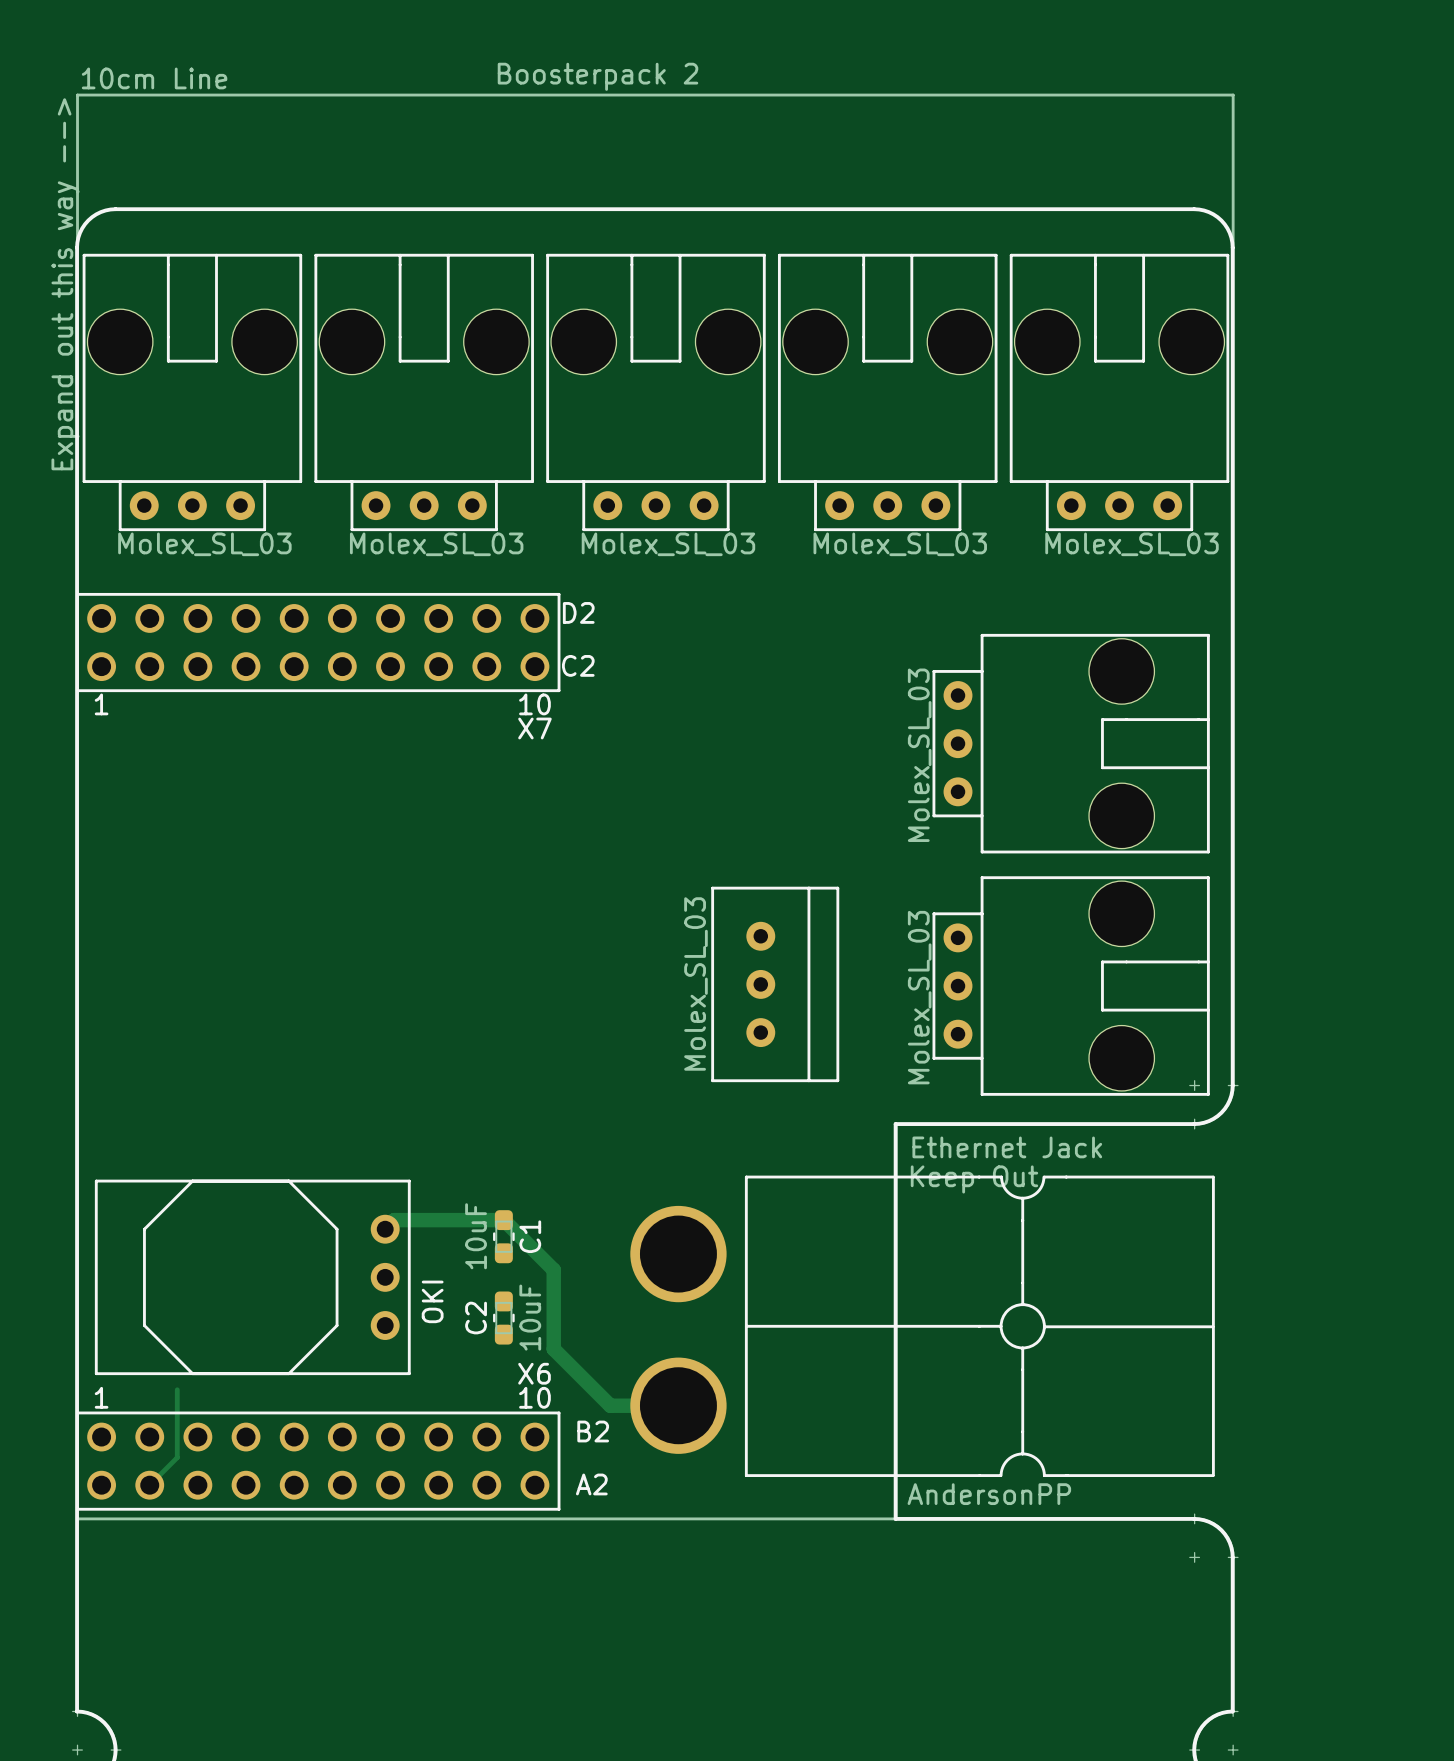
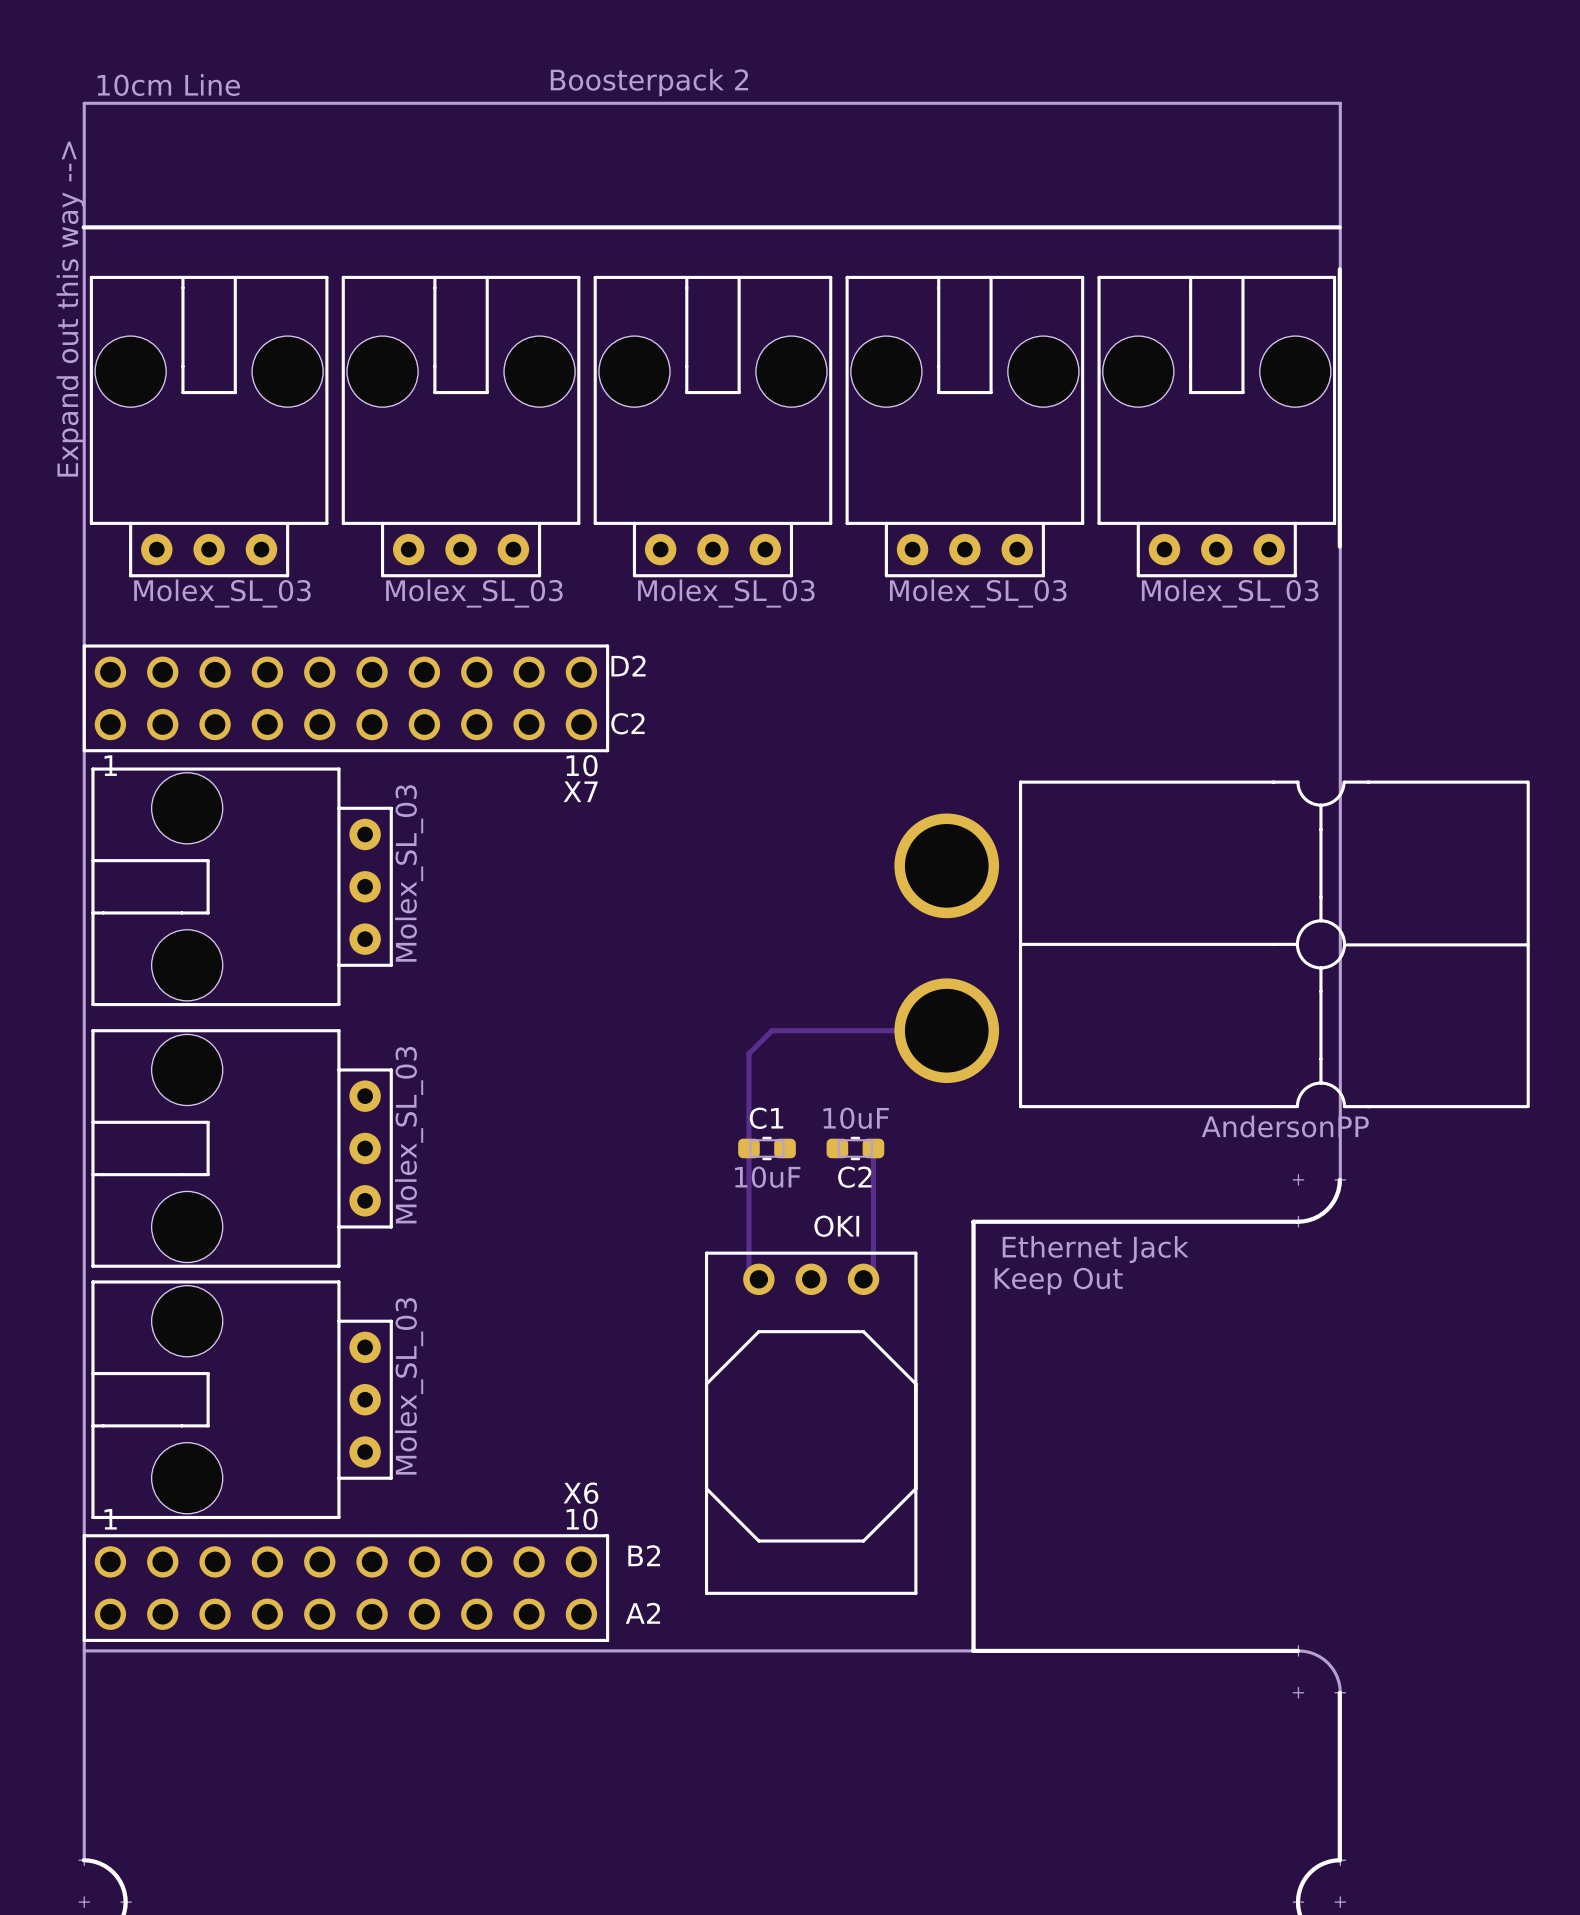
line: (115, 209) (100, 212) (88, 220) (79, 232) (77, 247) (77, 1711) -> (125, 227) (83, 227)
line: (1194, 209) (1208, 212) (1221, 220) (1229, 232) (1232, 247) -> (1297, 227) (1339, 227)
line: (1232, 502) (1232, 1085) -> none
part: Molex_SL_03 (1071, 743) -> none
part: none -> Molex_SL_03 (242, 886)
part: none -> AndersonPP (1212, 944)
track: none -> (946, 1030) (771, 1030) (748, 1053) (748, 1269) (758, 1279)
part: Molex_SL_03 (775, 984) -> none
part: Molex_SL_03 (1071, 986) -> none
part: none -> Molex_SL_03 (242, 1148)
track: none -> (873, 1148) (873, 1269) (863, 1279)
track: (385, 1229) (394, 1220) (503, 1220) (553, 1269) (553, 1349) (610, 1405) (678, 1405) -> none
C1 value position: 10uF (476, 1236) -> 10uF (767, 1177)
C1 rotation: 0° (503, 1236) -> 90° clockwise (767, 1148)
C1 position: (503, 1236) -> (767, 1148)
C1 name position: C1 (530, 1236) -> C1 (766, 1118)
part: OKI (252, 1277) -> none
part: none -> Molex_SL_03 (242, 1399)
part: none -> OKI (811, 1423)
C2 value position: 10uF (530, 1317) -> 10uF (856, 1118)
C2 name position: C2 (476, 1318) -> C2 (854, 1177)
C2 rotation: 0° (503, 1318) -> 90° clockwise (855, 1148)
C2 position: (503, 1318) -> (855, 1148)
part: AndersonPP (922, 1326) -> none
track: (177, 1389) (177, 1457) (149, 1485) -> none
line: (1194, 1518) (1208, 1521) (1221, 1530) (1229, 1542) (1232, 1557) -> none

